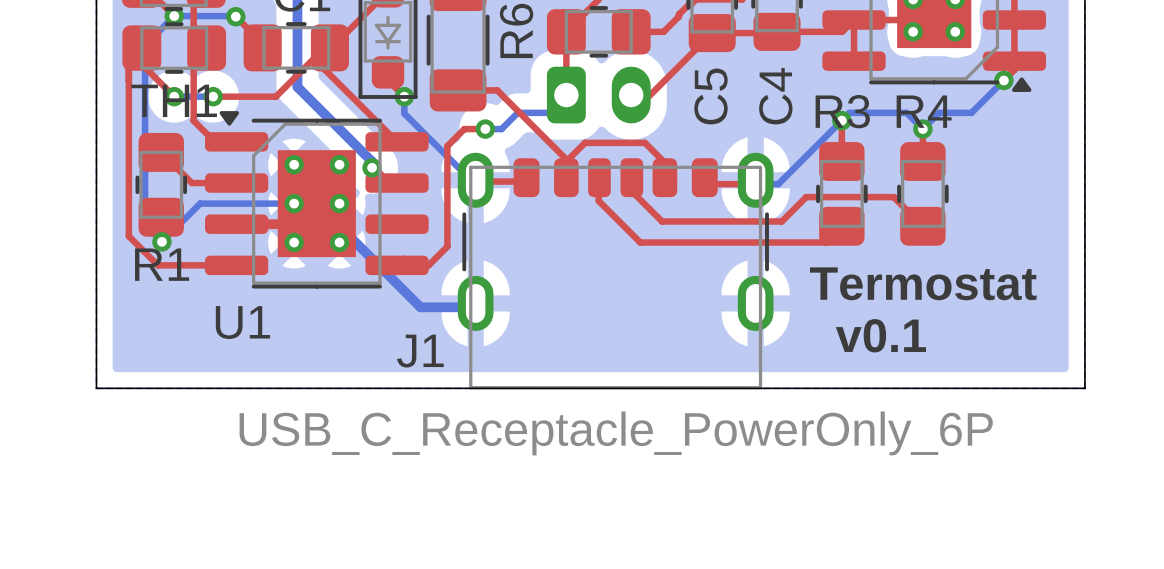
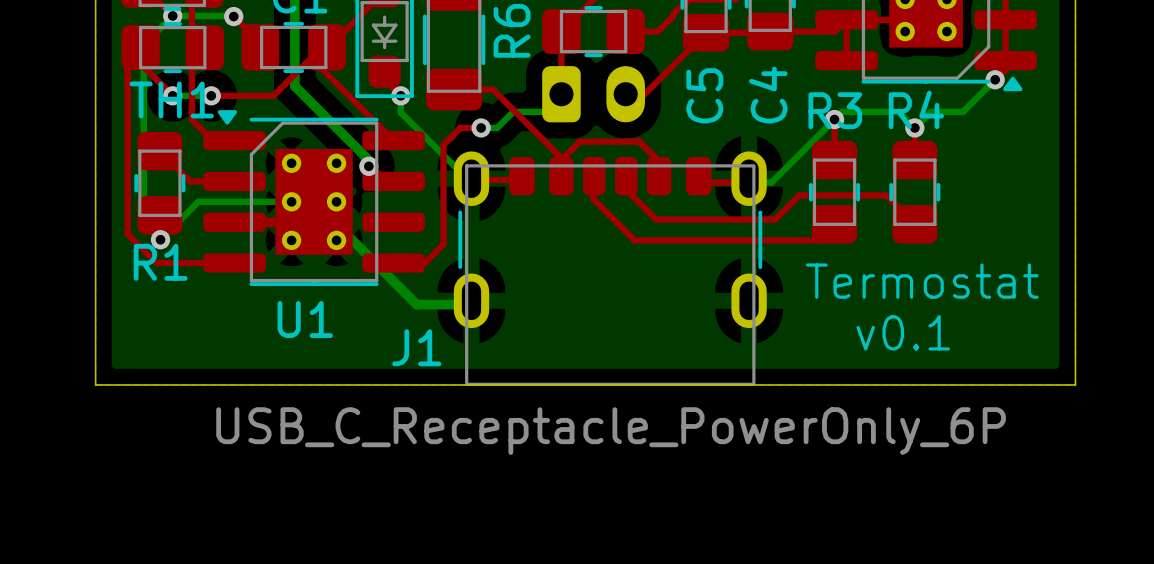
U1 name position: U1 (242, 322) -> U1 (305, 319)

